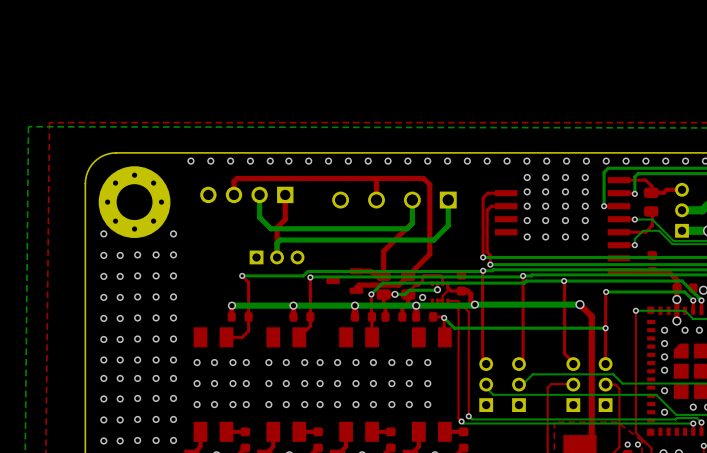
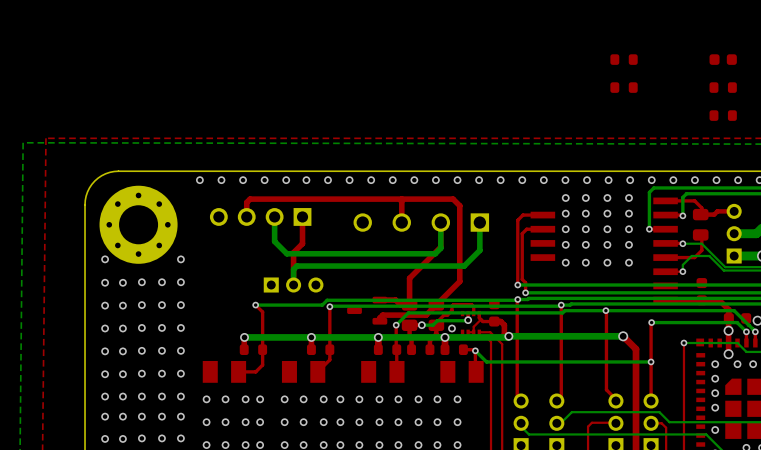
part: none -> (624, 59)
part: none -> (723, 59)
part: none -> (624, 87)
part: none -> (723, 87)
part: none -> (723, 115)

